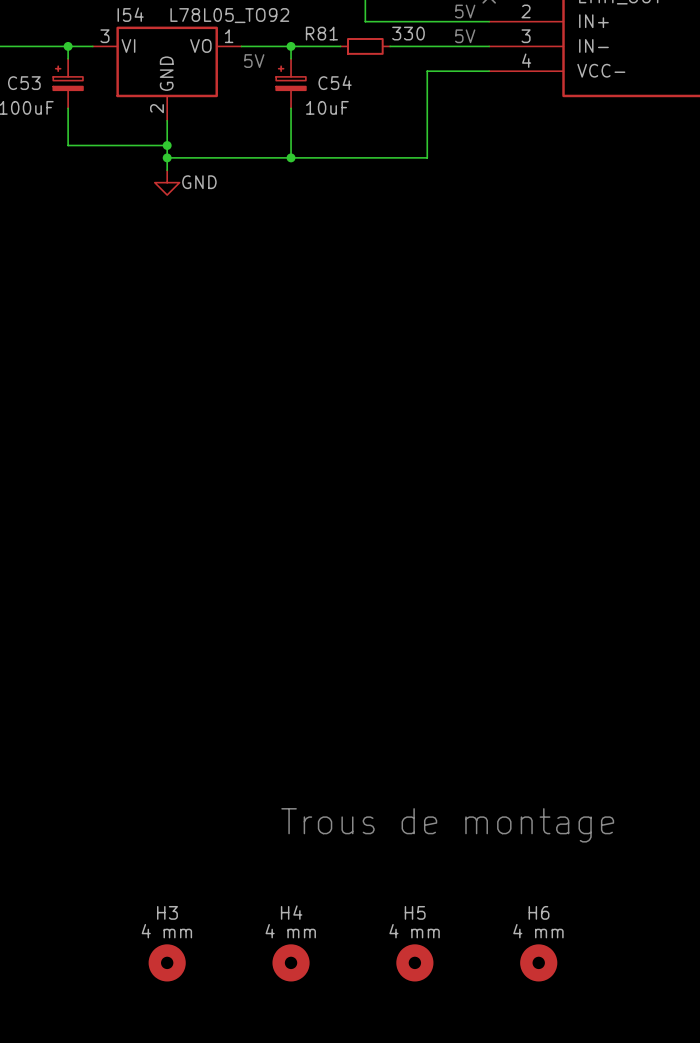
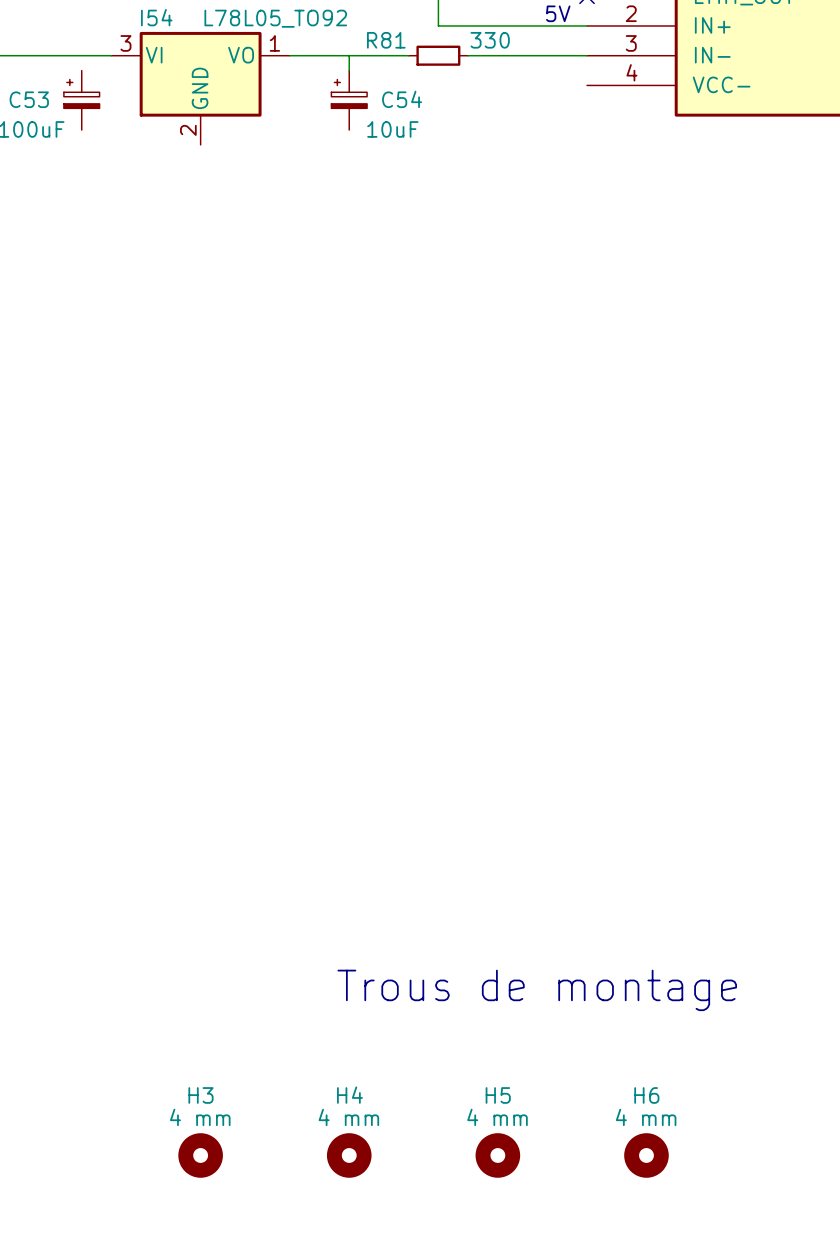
text: 5V (465, 36) -> none
wire: (68, 46) (68, 58) -> none
junction: (68, 46) -> none
junction: (291, 46) -> none
text: 5V (254, 61) -> none
wire: (489, 71) (427, 71) (427, 157) (167, 157) -> none
wire: (68, 108) (68, 145) (167, 145) -> none
wire: (291, 108) (291, 157) -> none
wire: (167, 120) (167, 170) -> none
junction: (167, 145) -> none
junction: (167, 157) -> none
junction: (291, 157) -> none
power symbol: GND (167, 182) -> none

